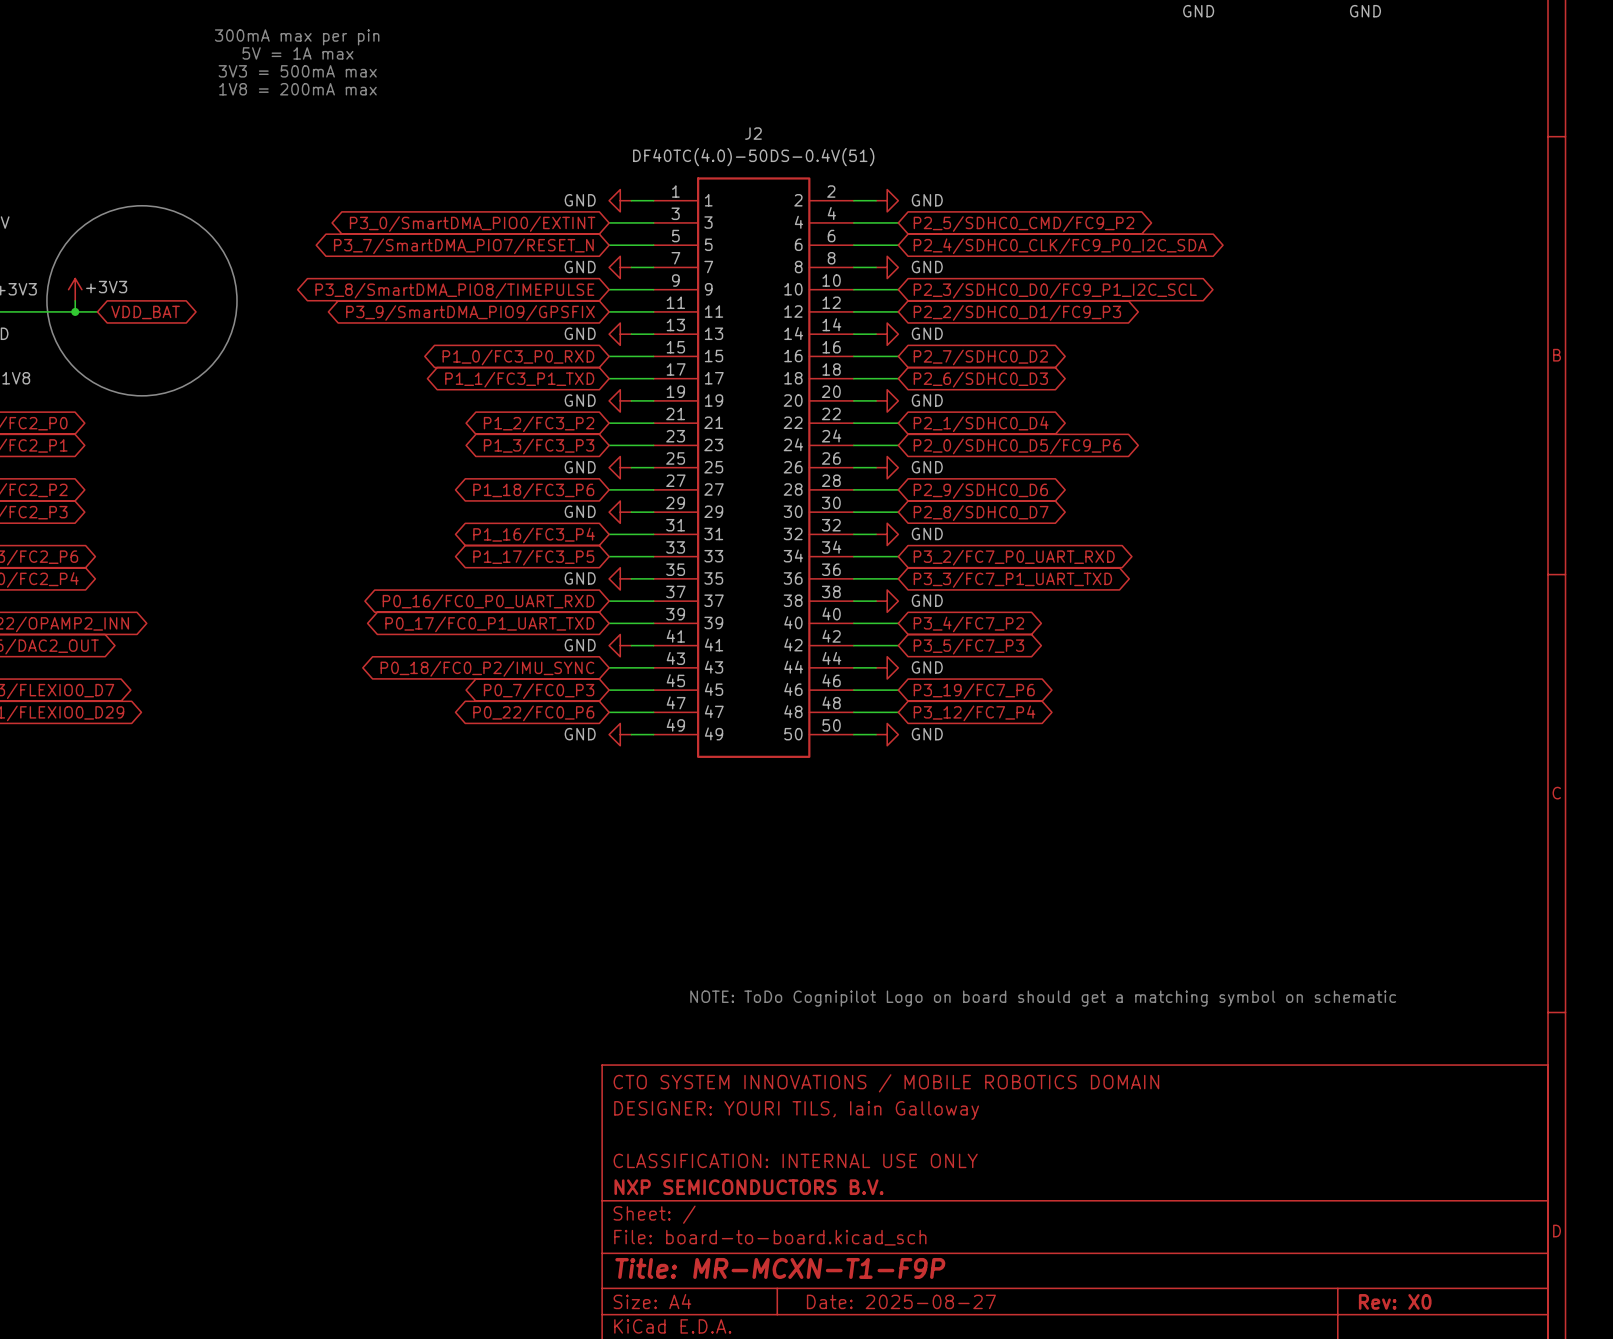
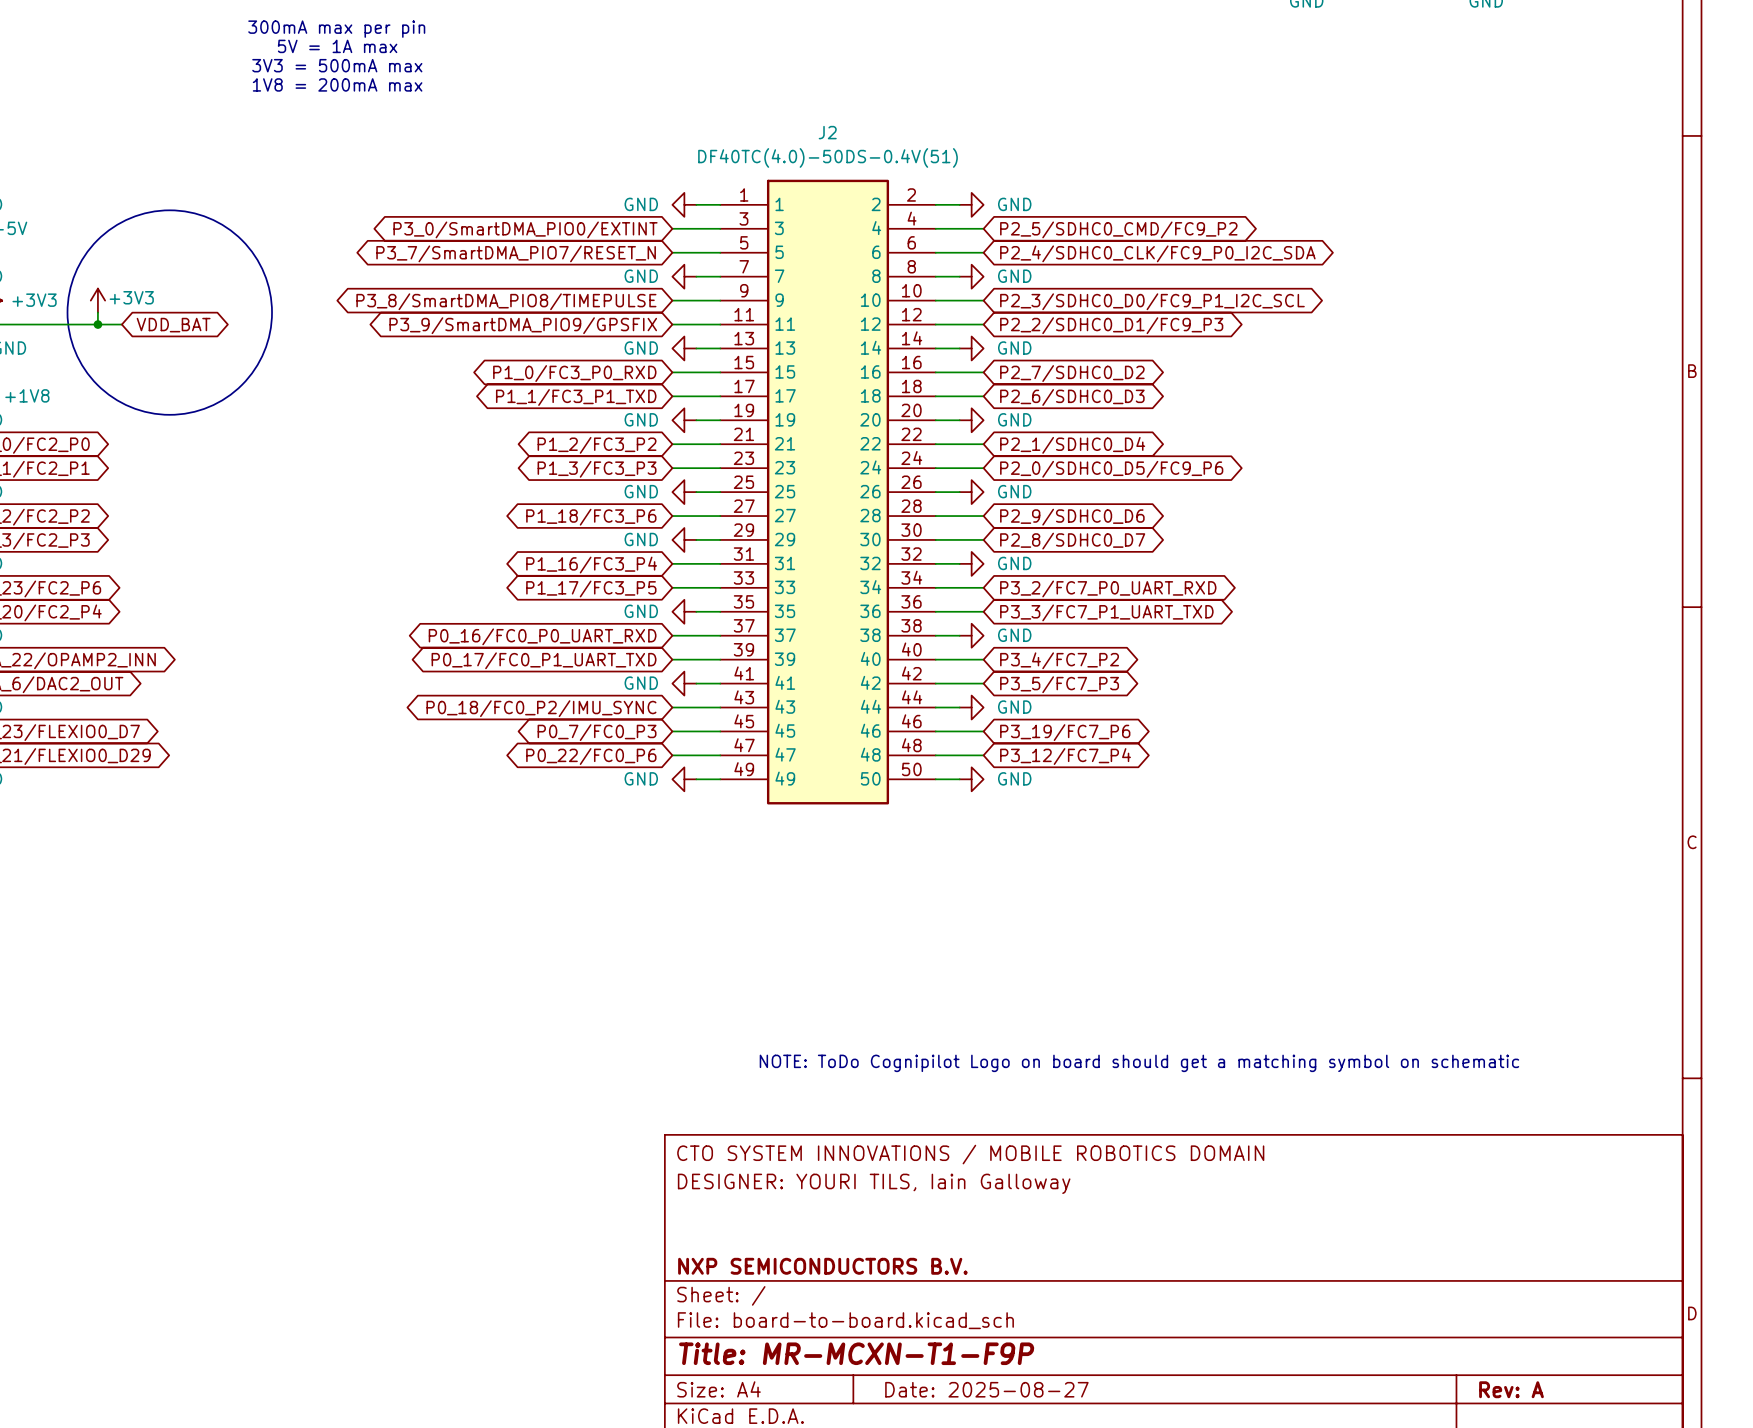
title block: CLASSIFICATION: INTERNAL USE ONLY (795, 1160) -> none
title block: Rev: X0 (1395, 1301) -> Rev: A (1511, 1389)

